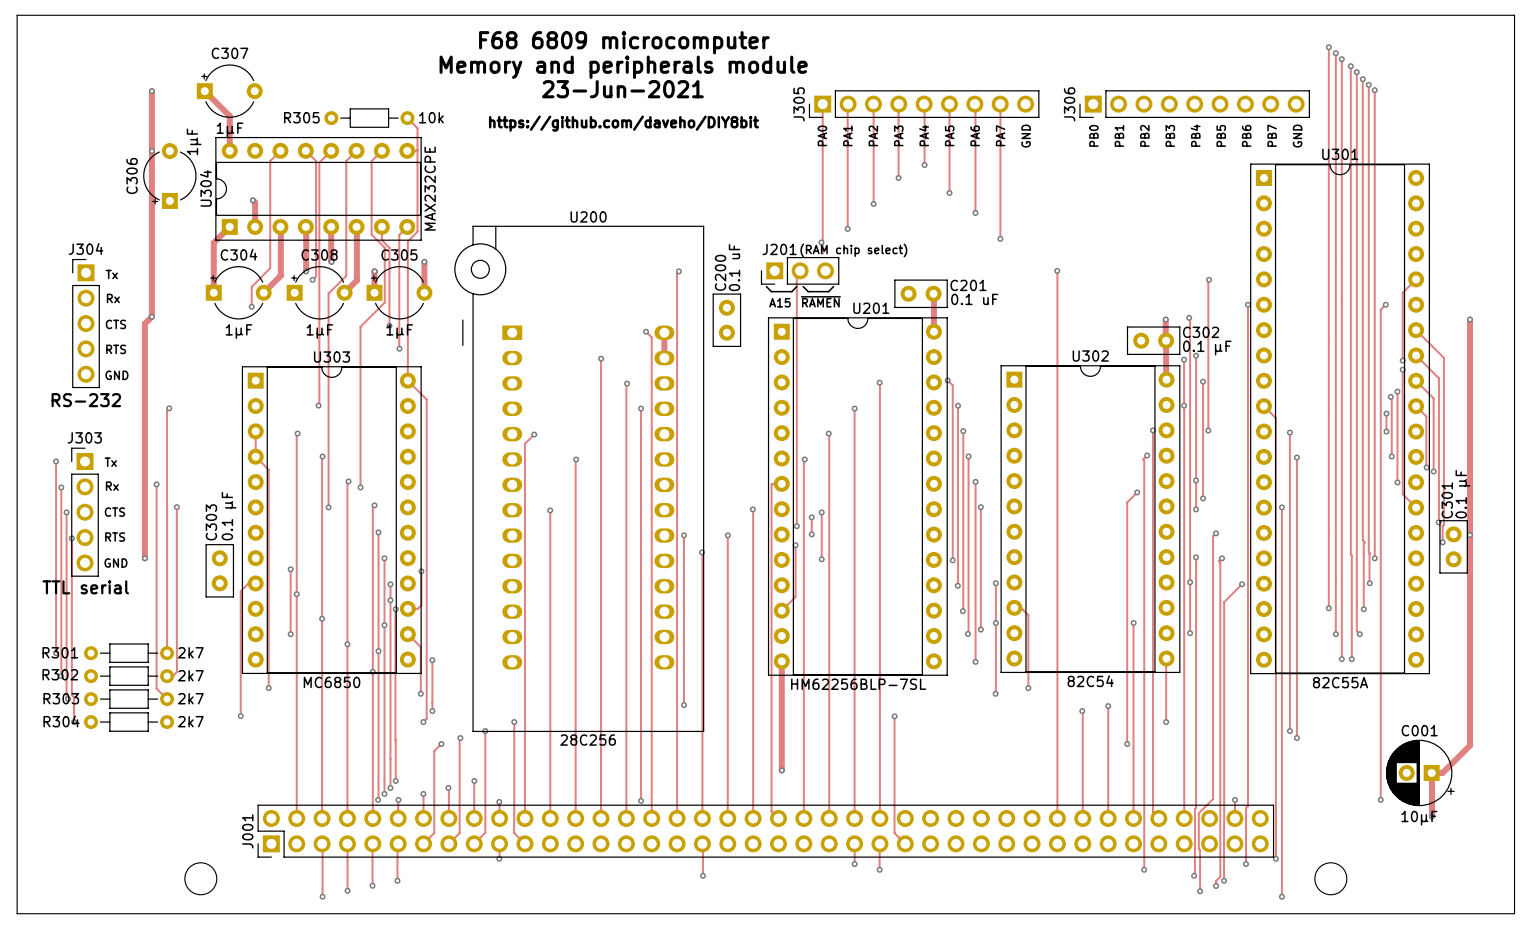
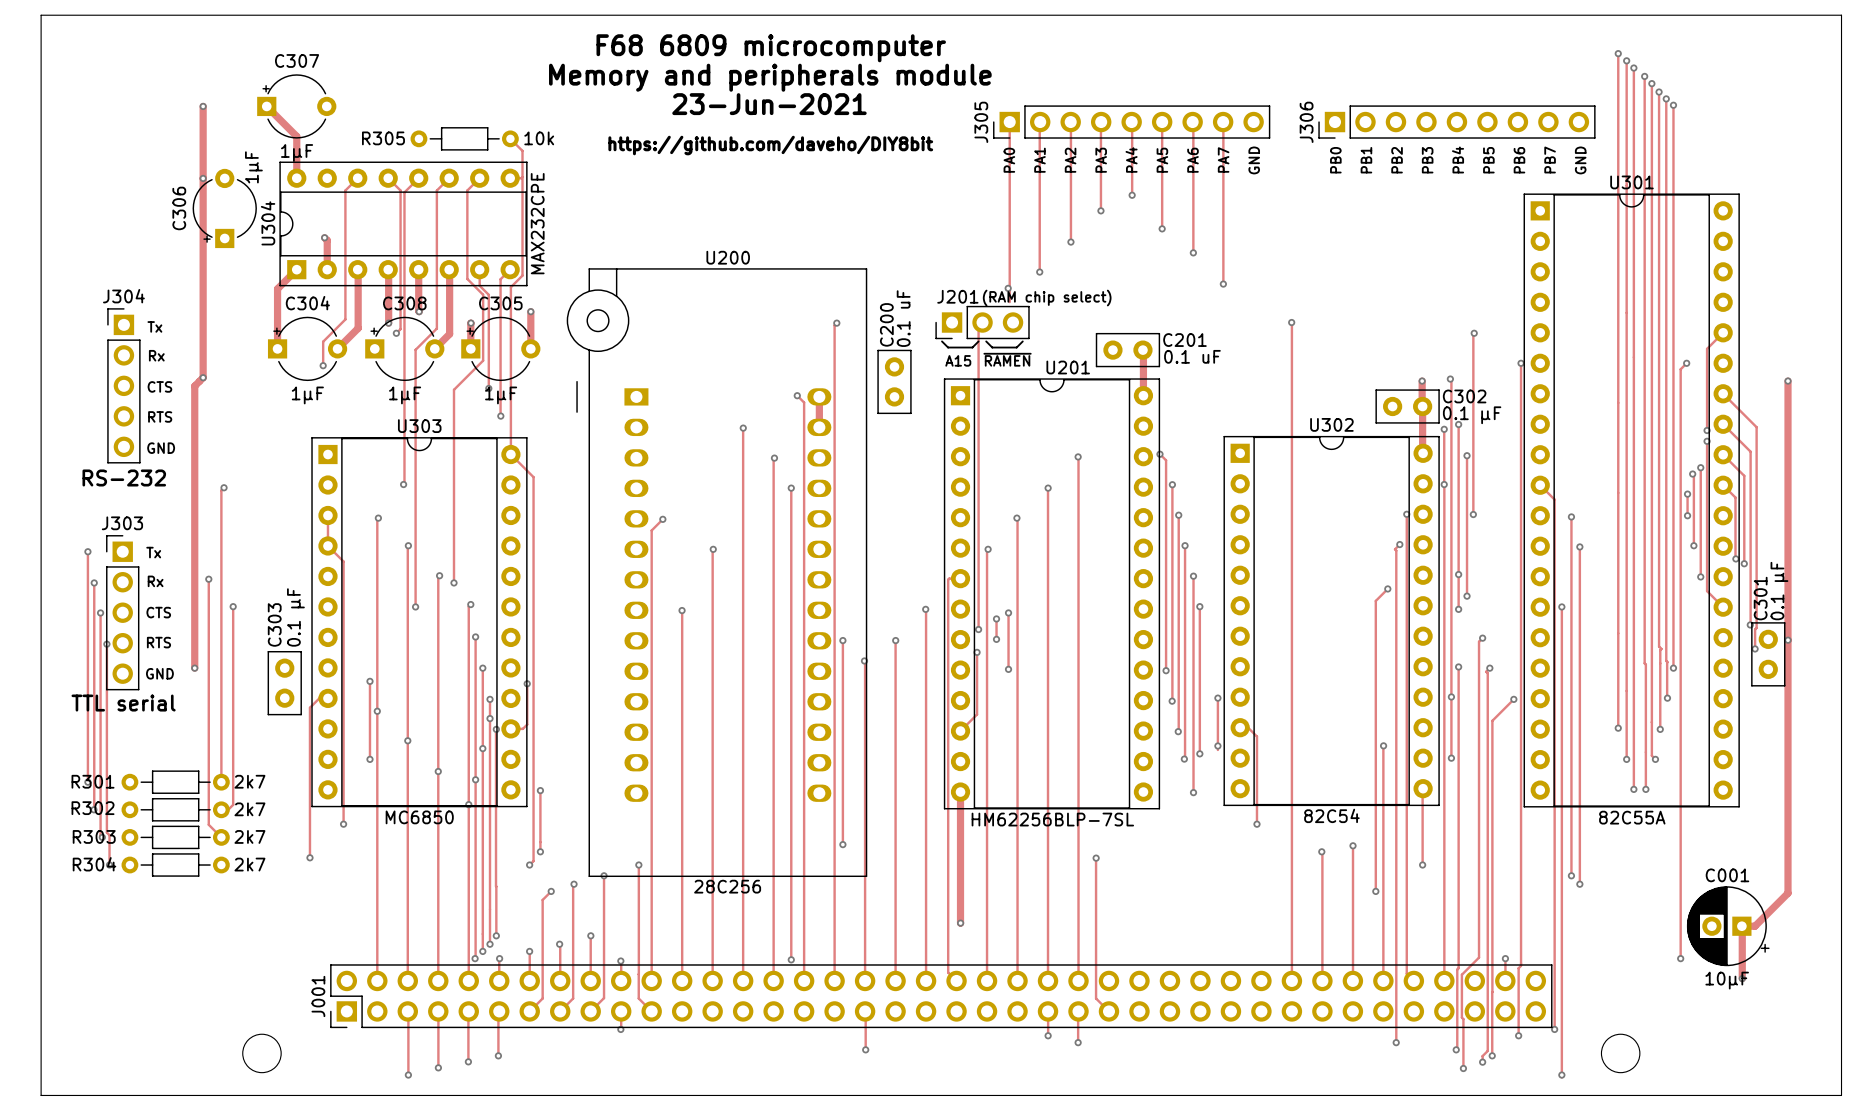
track: (995, 626) (995, 693) -> none
track: (407, 634) (420, 647) (420, 693) -> none
via: (420, 693) -> none
via: (995, 693) -> none

